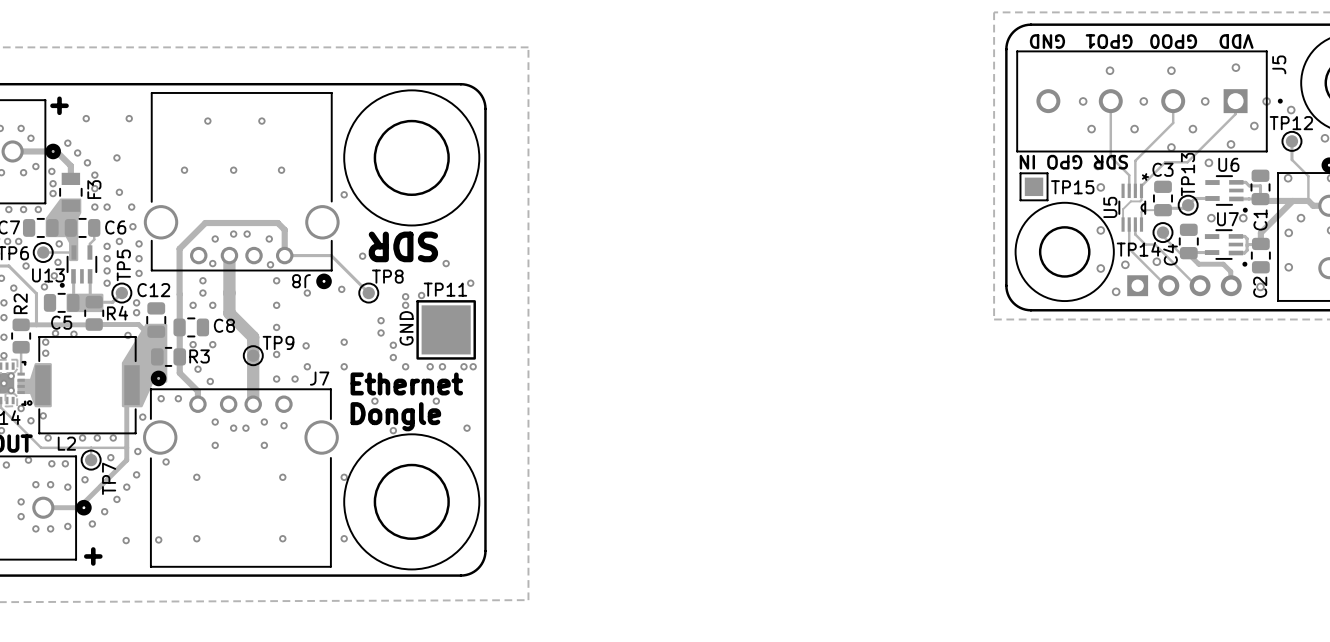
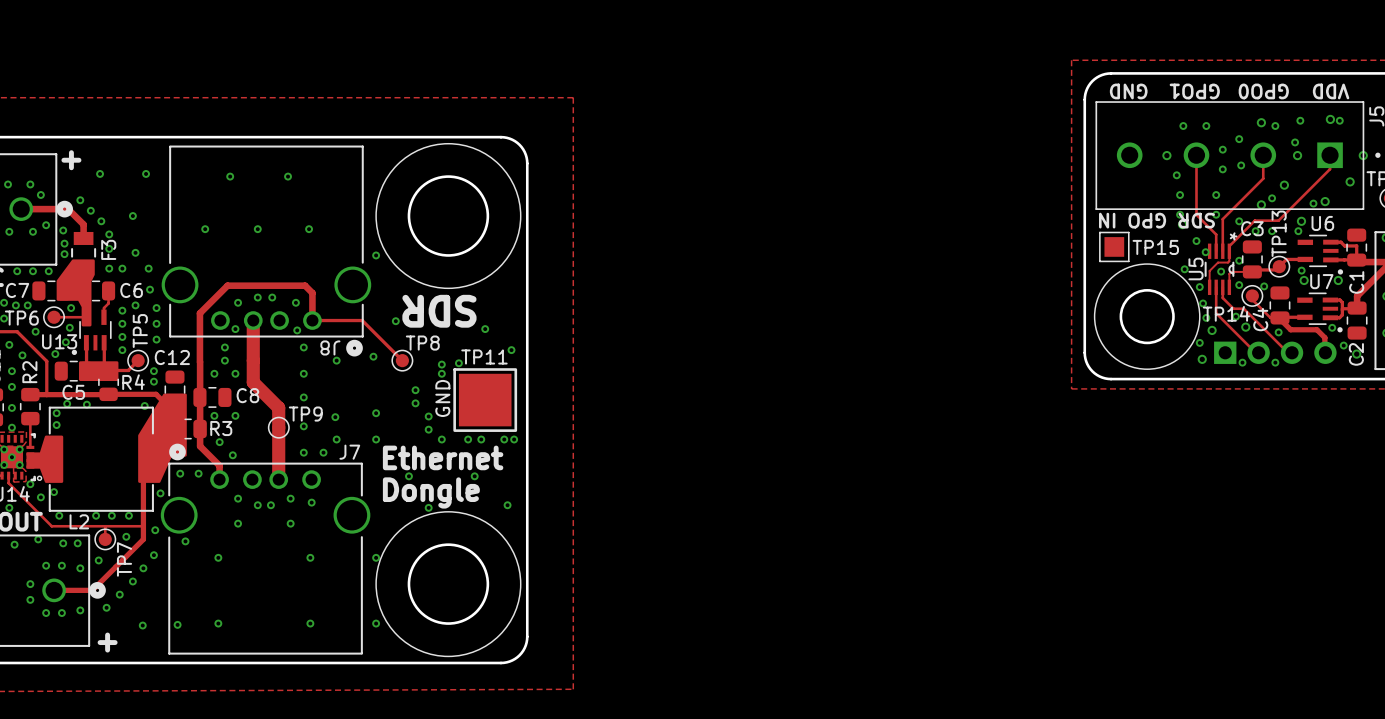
via: none -> (1300, 120)
via: none -> (1339, 120)
via: (1110, 70) -> none
via: none -> (1183, 126)
via: none -> (1206, 126)
via: none -> (1275, 126)
via: none -> (1239, 139)
via: none -> (1295, 142)
via: none -> (1222, 149)
via: (1143, 101) -> none
via: none -> (1241, 165)
via: none -> (1222, 169)
via: none -> (1176, 175)
via: (1091, 129) -> none
via: (1134, 129) -> none
via: none -> (1180, 195)
via: none -> (1216, 195)
via: none -> (1272, 198)
via: none -> (1313, 203)
via: none -> (1180, 214)
via: none -> (1216, 214)
via: none -> (1239, 221)
via: none -> (1255, 231)
via: none -> (1272, 231)
via: none -> (1298, 231)
via: none -> (1196, 241)
via: (1100, 187) -> none
via: none -> (1205, 252)
via: none -> (1239, 260)
via: none -> (1184, 269)
via: none -> (1301, 270)
via: none -> (1221, 271)
via: none -> (1239, 285)
via: none -> (1264, 286)
via: none -> (1199, 287)
via: (1100, 230) -> none
via: none -> (1203, 303)
via: none -> (1235, 316)
via: none -> (1206, 317)
via: none -> (1332, 327)
via: none -> (1278, 332)
via: (1100, 268) -> none
via: none -> (1199, 342)
via: none -> (1343, 345)
via: none -> (1242, 362)
via: none -> (1275, 362)

